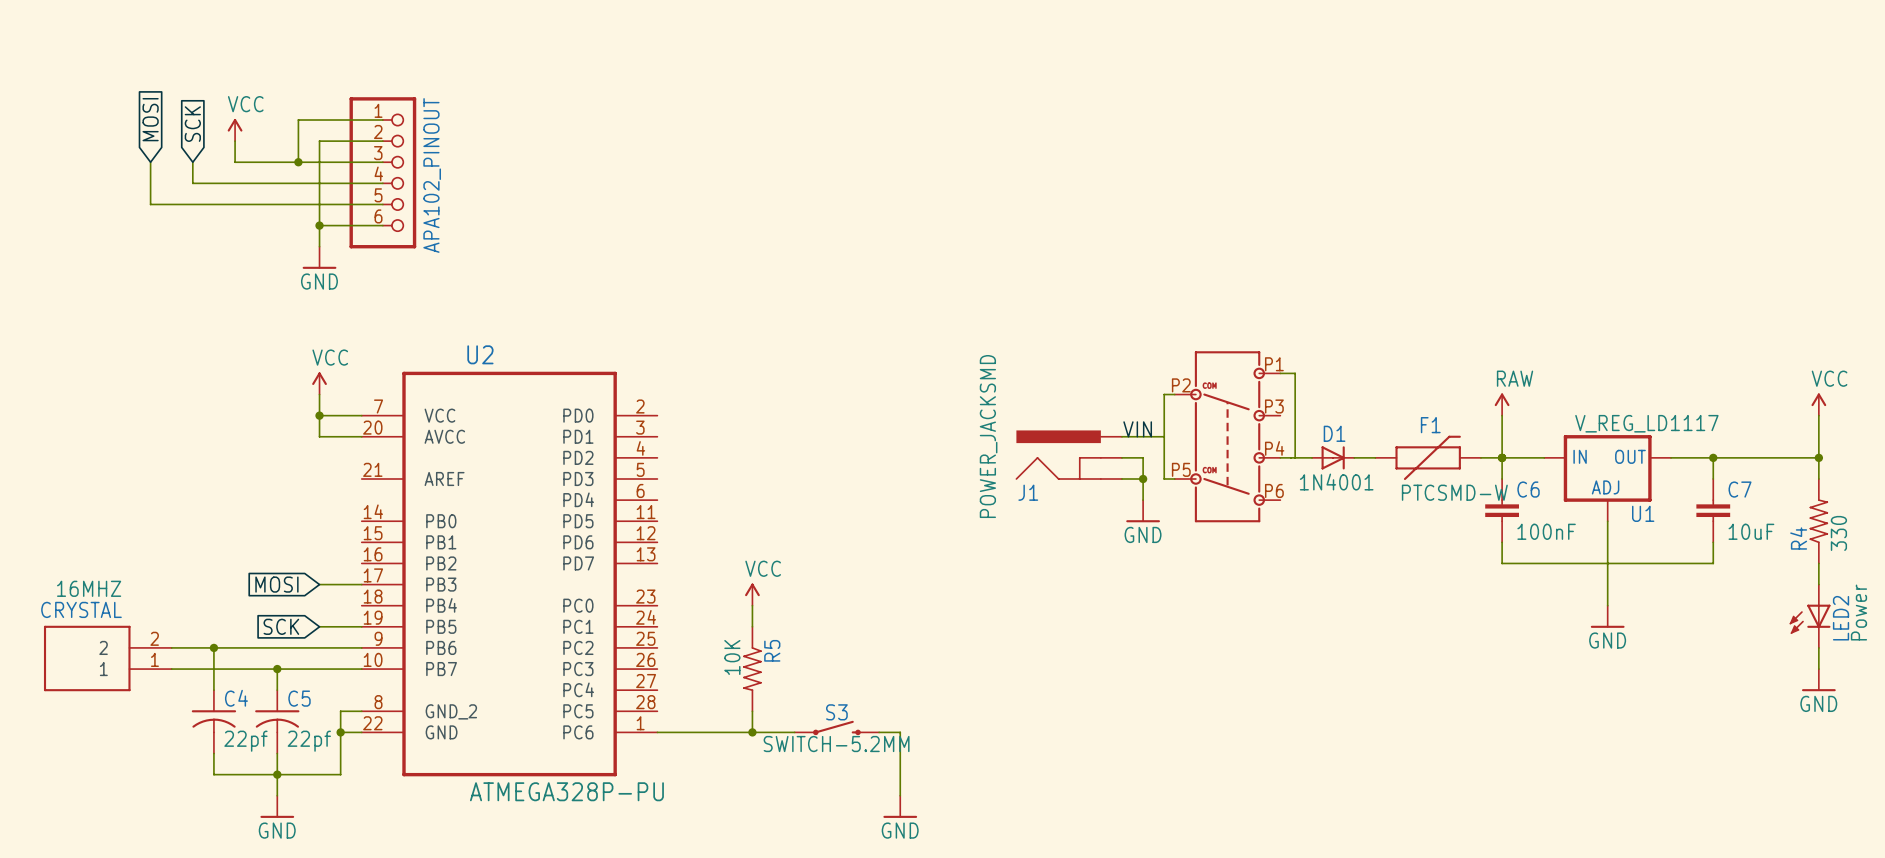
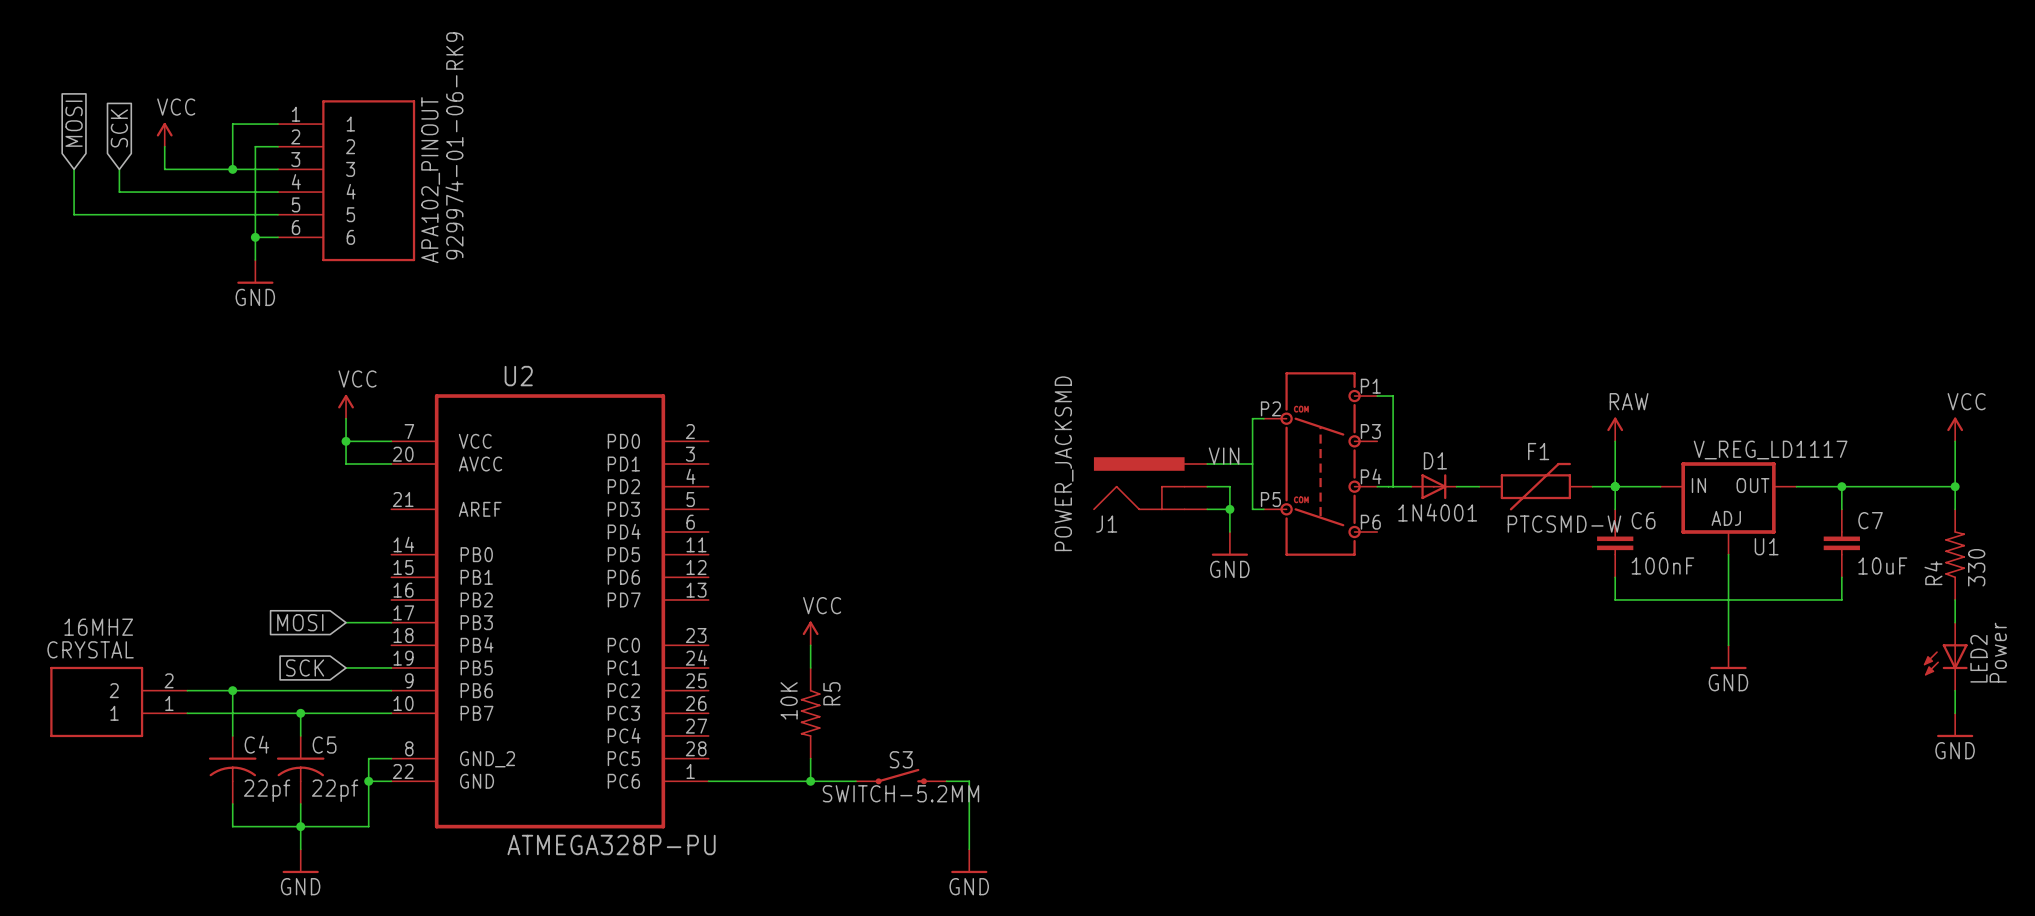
APA102_PINOUT symbol: [349, 97, 417, 249] -> [278, 100, 416, 262]
global label position: MOSI (150, 119) -> MOSI (74, 123)
wire: none -> (278, 124) (232, 124) (232, 169)
wire: (382, 120) (298, 120) (298, 162) -> none
global label position: SCK (192, 124) -> SCK (119, 128)
power symbol position: VCC (235, 130) -> VCC (164, 134)
APA102_PINOUT value: none -> 929974-01-06-RK9 (454, 145)
wire: none -> (164, 146) (164, 169) (255, 169) (255, 260)
wire: none -> (255, 146) (278, 146)
wire: (382, 141) (319, 141) (319, 246) -> none
wire: (150, 162) (150, 204) -> (74, 169) (74, 214) (164, 214)
wire: (192, 162) (192, 183) -> (119, 169) (119, 192) (210, 192)
junction: none -> (232, 169)
wire: (256, 162) (382, 162) -> none
junction: (298, 162) -> none
APA102_PINOUT name position: APA102_PINOUT (432, 175) -> APA102_PINOUT (430, 180)
wire: (256, 183) (382, 183) -> none
wire: (256, 204) (382, 204) -> none
wire: none -> (255, 237) (278, 237)
junction: none -> (255, 237)
wire: (319, 225) (382, 225) -> none
junction: (319, 225) -> none
power symbol position: GND (319, 257) -> GND (255, 271)

